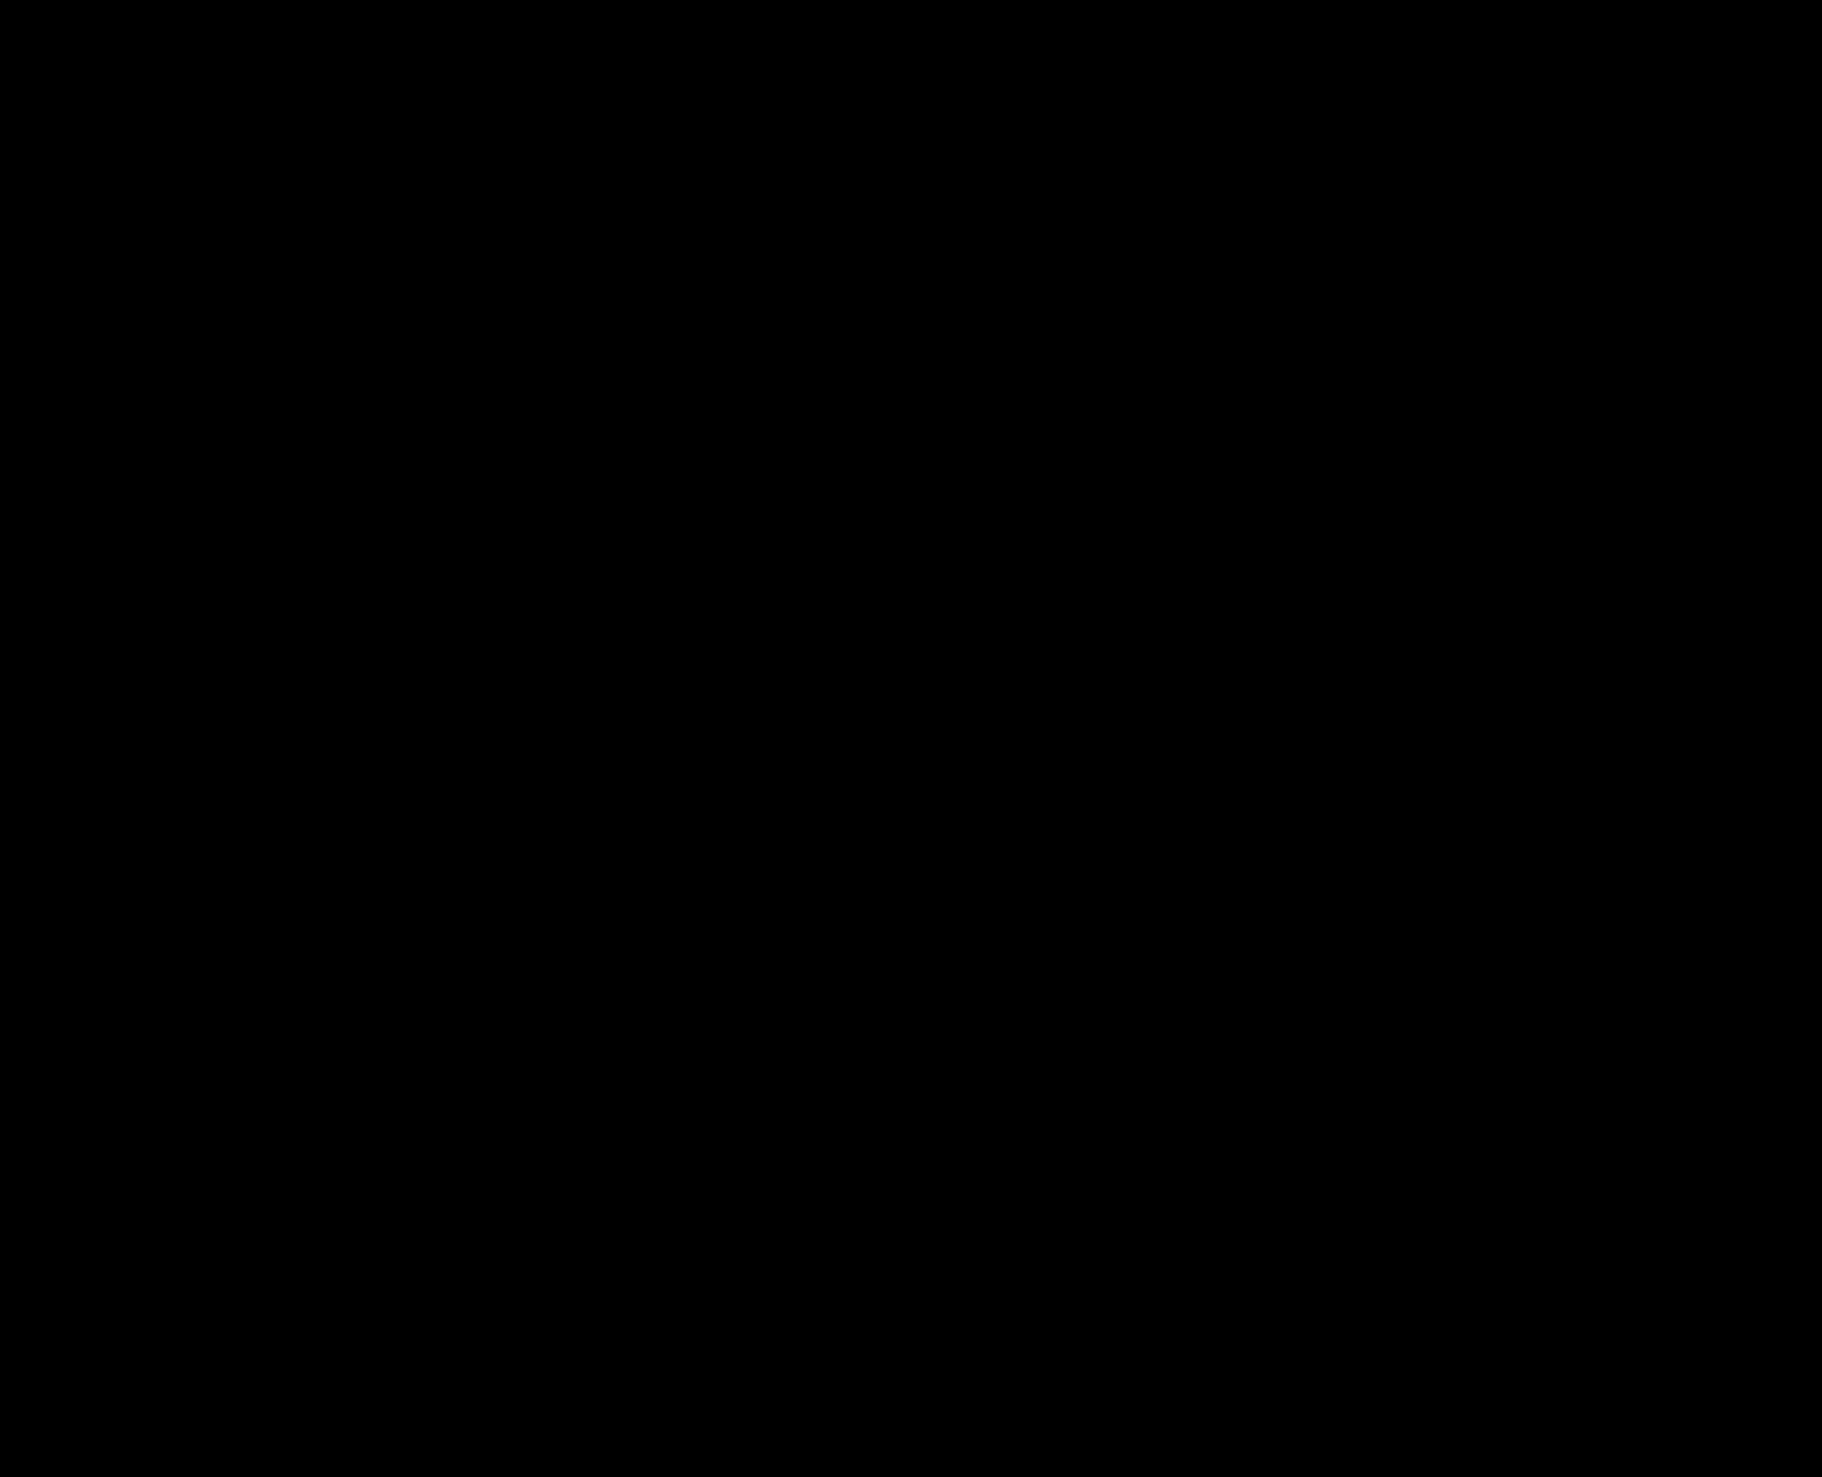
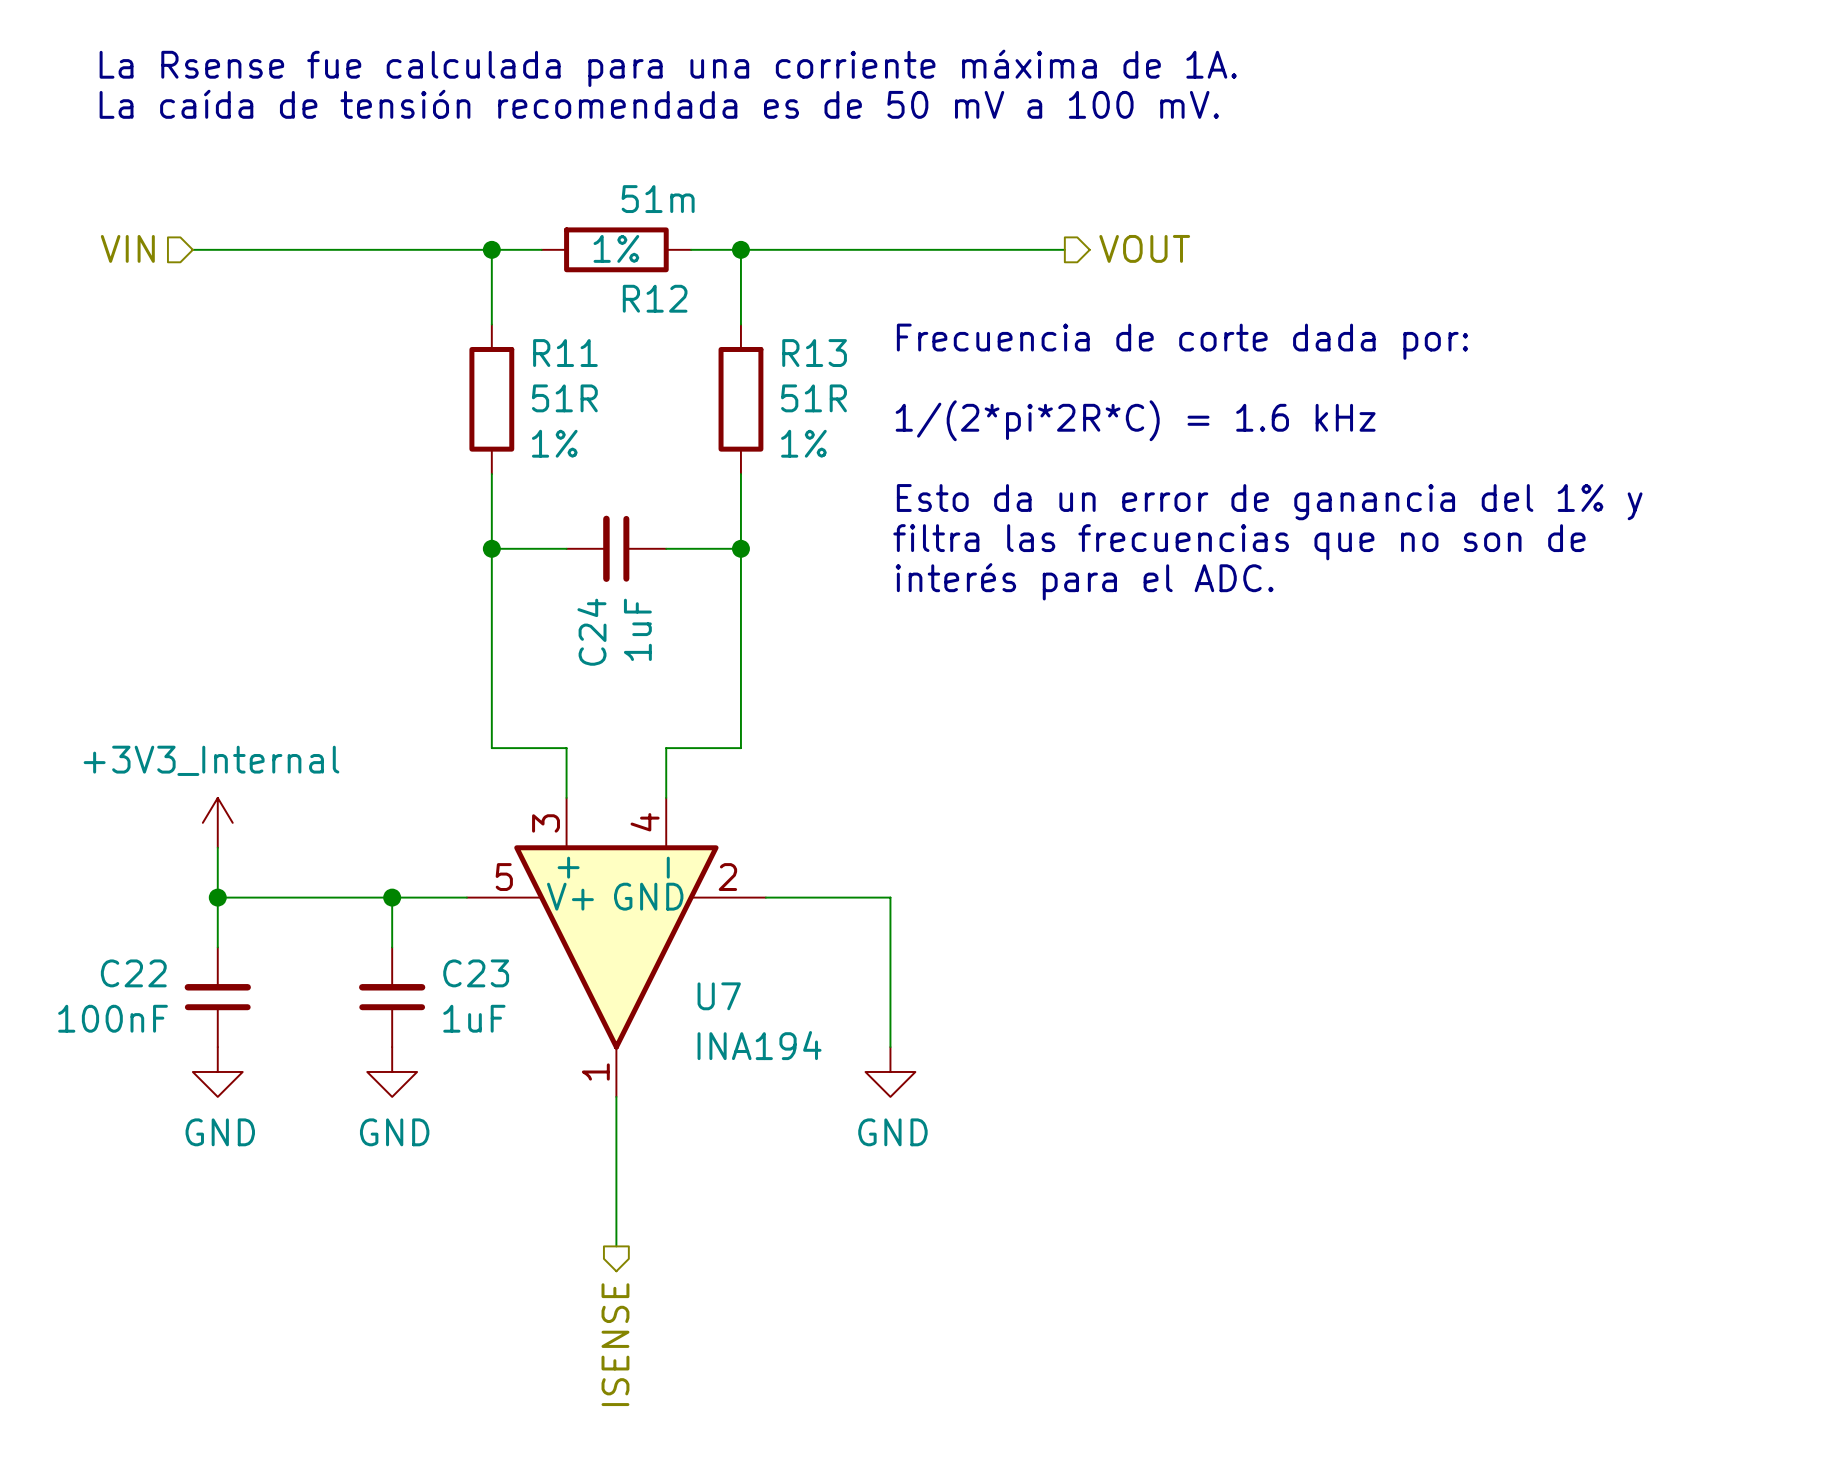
text: none -> La Rsense fue calculada para una corriente máxima de 1A. (668, 68)
text: none -> La caída de tensión recomendada es de 50 mV a 100 mV. (659, 104)
hierarchical label: none -> VIN (127, 248)
hierarchical label: none -> VOUT (1144, 248)
wire: none -> (192, 249) (541, 249)
wire: none -> (491, 249) (491, 324)
junction: none -> (491, 249)
R12: none -> 51m (616, 249)
wire: none -> (691, 249) (1064, 249)
wire: none -> (740, 249) (740, 324)
junction: none -> (740, 249)
text: none -> Frecuencia de corte dada por: (1182, 341)
R11: none -> 51R (491, 399)
R13: none -> 51R (740, 399)
text: none -> 1/(2*pi*2R*C) = 1.6 kHz (1135, 420)
wire: none -> (491, 474) (491, 748) (566, 748) (566, 797)
wire: none -> (740, 474) (740, 748) (666, 748) (666, 797)
text: none -> Esto da un error de ganancia del 1% y (1269, 502)
text: none -> filtra las frecuencias que no son de (1239, 542)
wire: none -> (491, 548) (566, 548)
junction: none -> (491, 548)
C24: none -> 1uF (616, 548)
wire: none -> (666, 548) (740, 548)
junction: none -> (740, 548)
text: none -> interés para el ADC. (1084, 581)
power symbol: none -> +3V3_Internal (217, 822)
wire: none -> (217, 847) (217, 947)
wire: none -> (217, 897) (466, 897)
junction: none -> (217, 897)
wire: none -> (392, 897) (392, 947)
junction: none -> (392, 897)
wire: none -> (765, 897) (890, 897) (890, 1047)
U7: none -> INA194 (616, 947)
C22: none -> 100nF (217, 997)
C23: none -> 1uF (392, 997)
power symbol: none -> GND (217, 1071)
power symbol: none -> GND (392, 1071)
power symbol: none -> GND (890, 1071)
wire: none -> (616, 1096) (616, 1246)
hierarchical label: none -> ISENSE (615, 1344)

